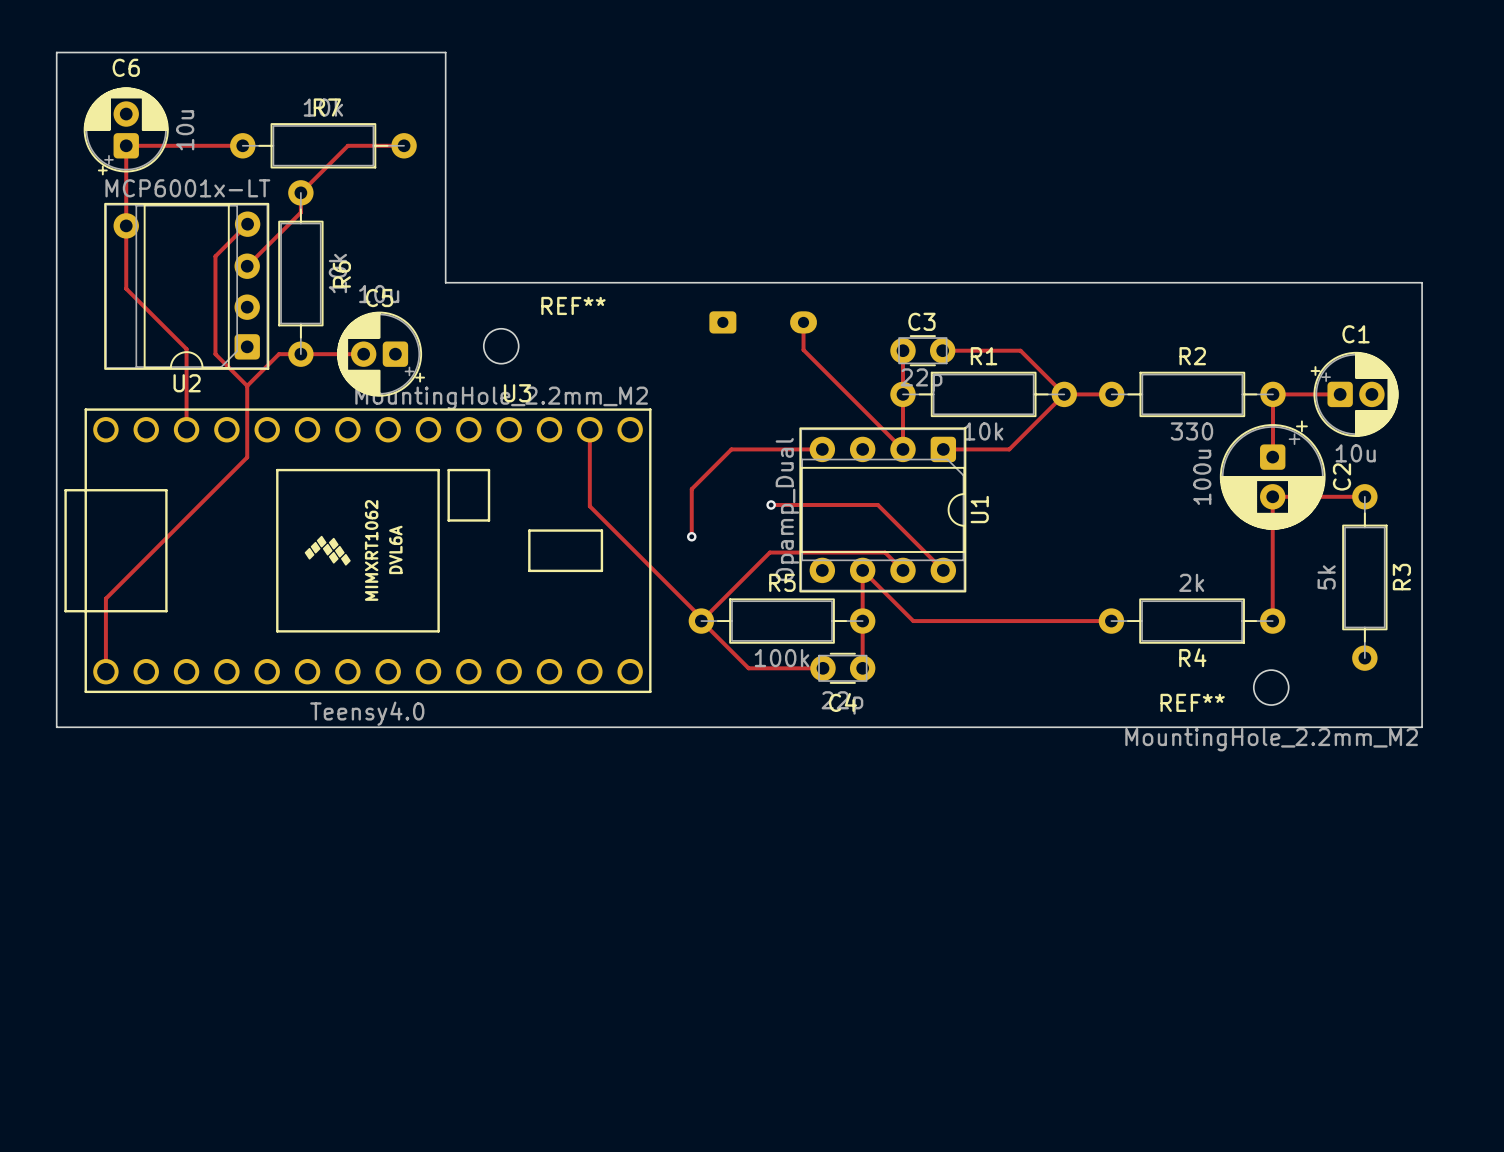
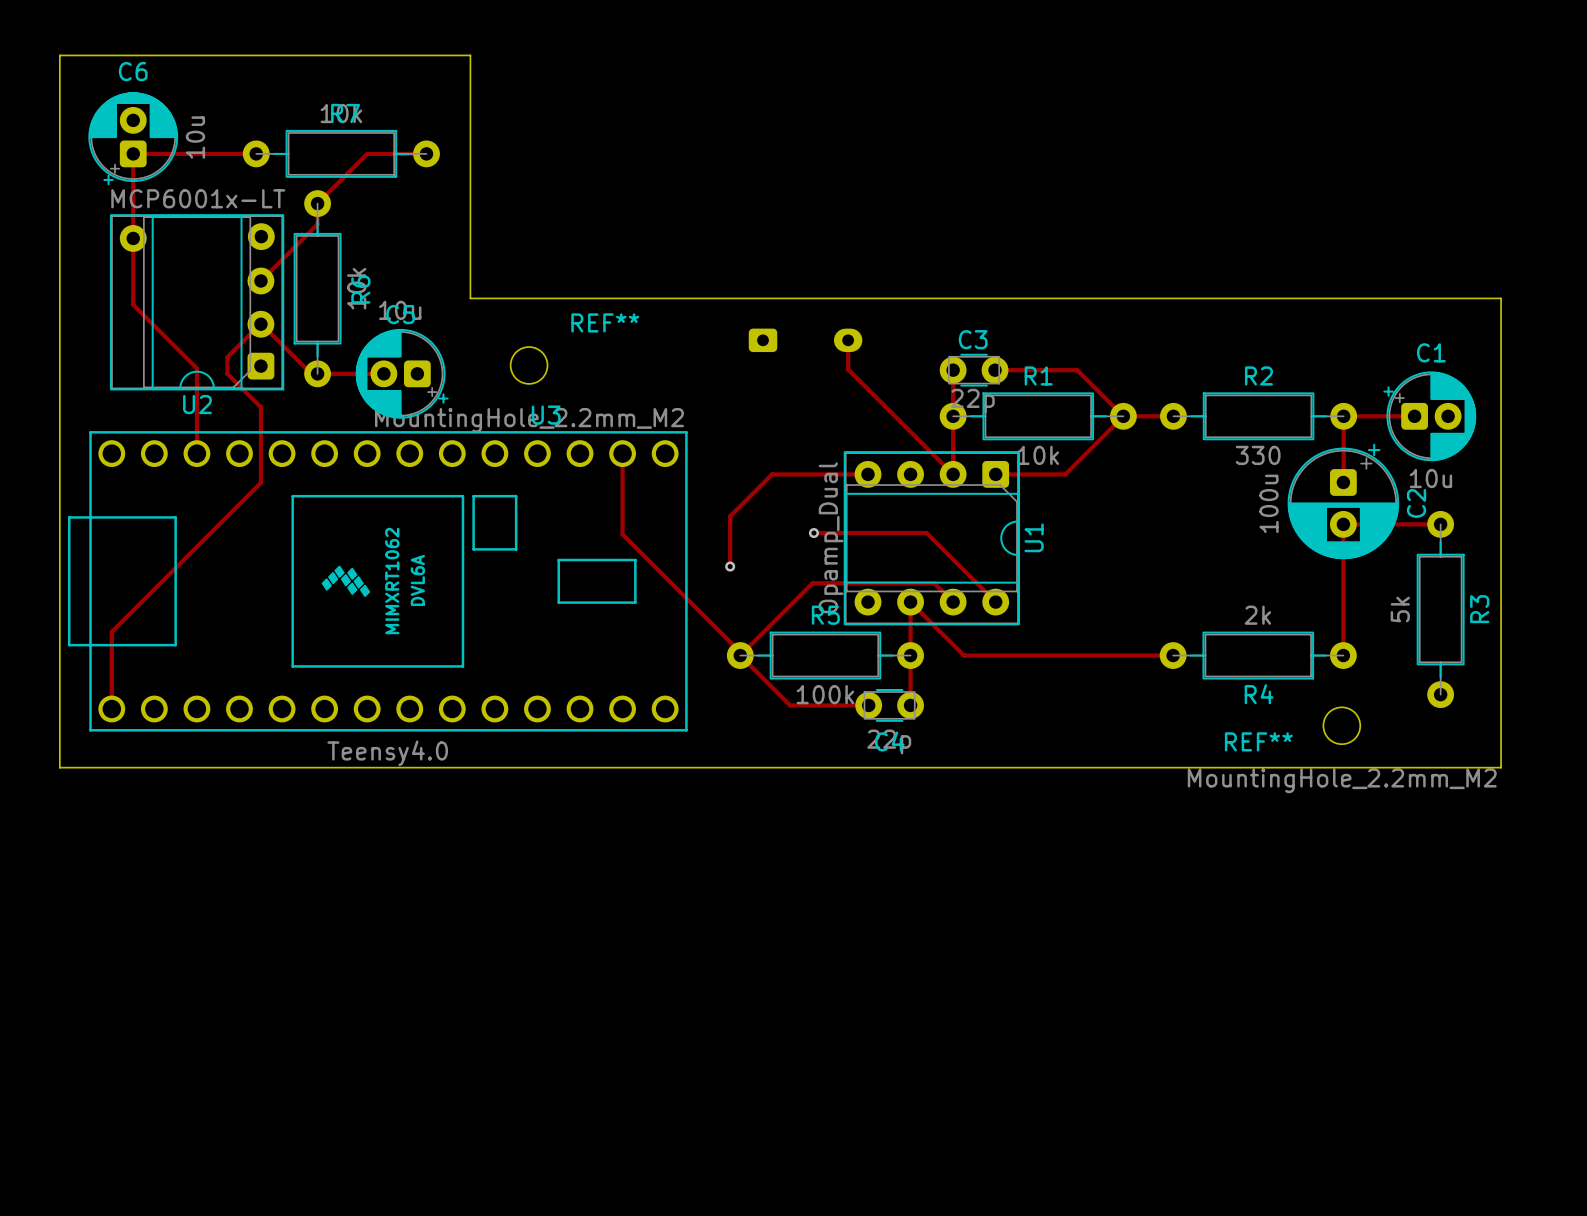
track: (247, 224) (215, 256) (215, 338) -> none
track: (294, 354) (278, 354) (247, 385) -> (311, 373) (260, 323) (227, 357)

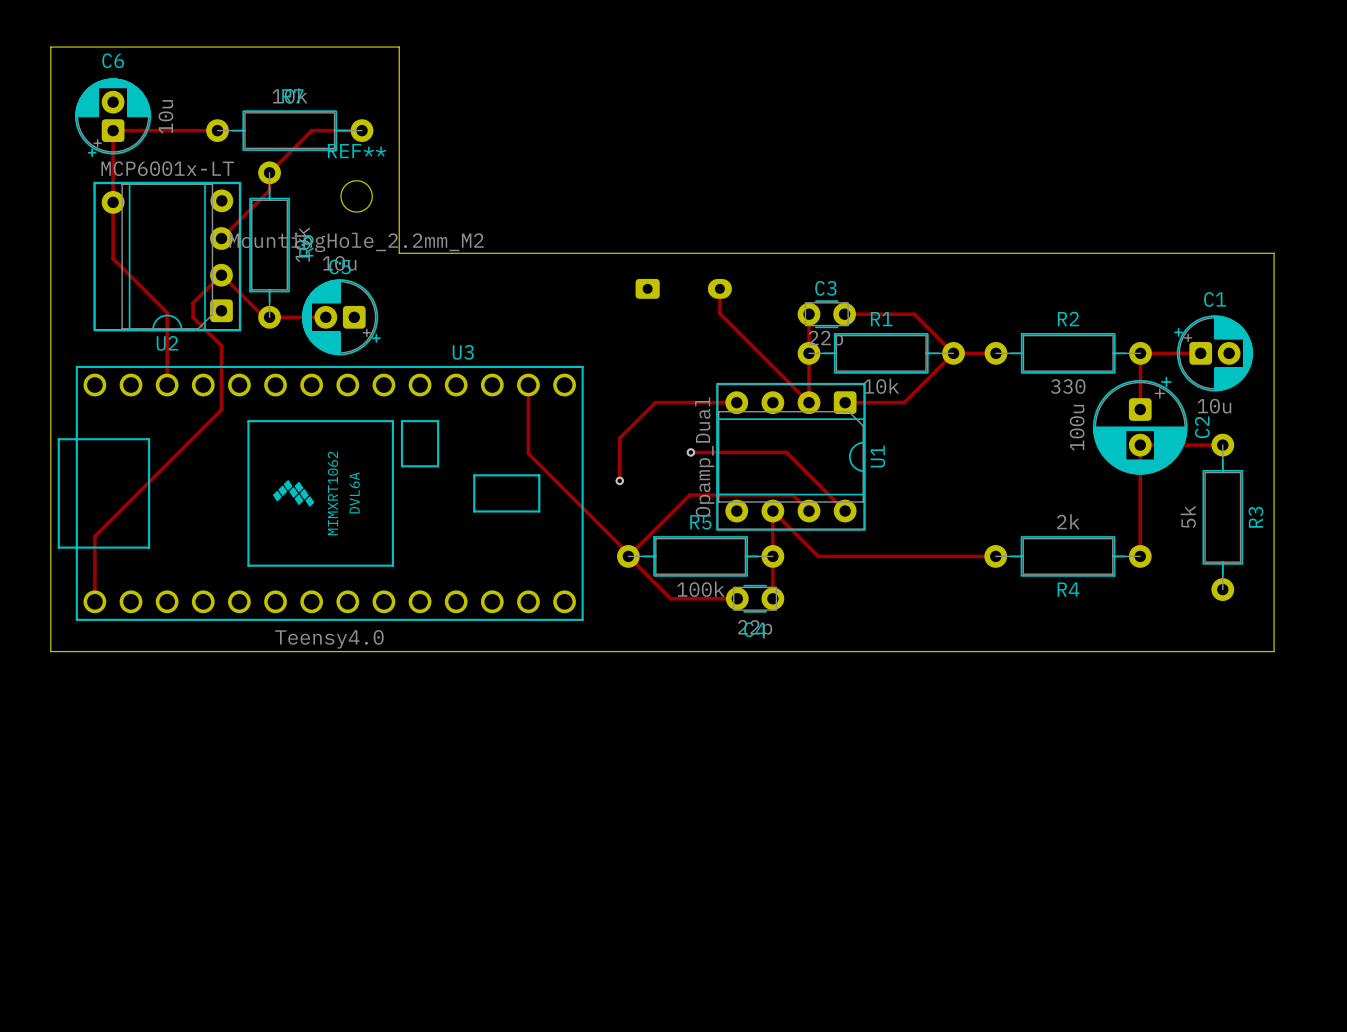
REF** name position: REF** (605, 322) -> REF** (357, 151)
REF** position: (529, 365) -> (356, 196)
REF**: MountingHole_2.2mm_M2 (1341, 725) -> none

